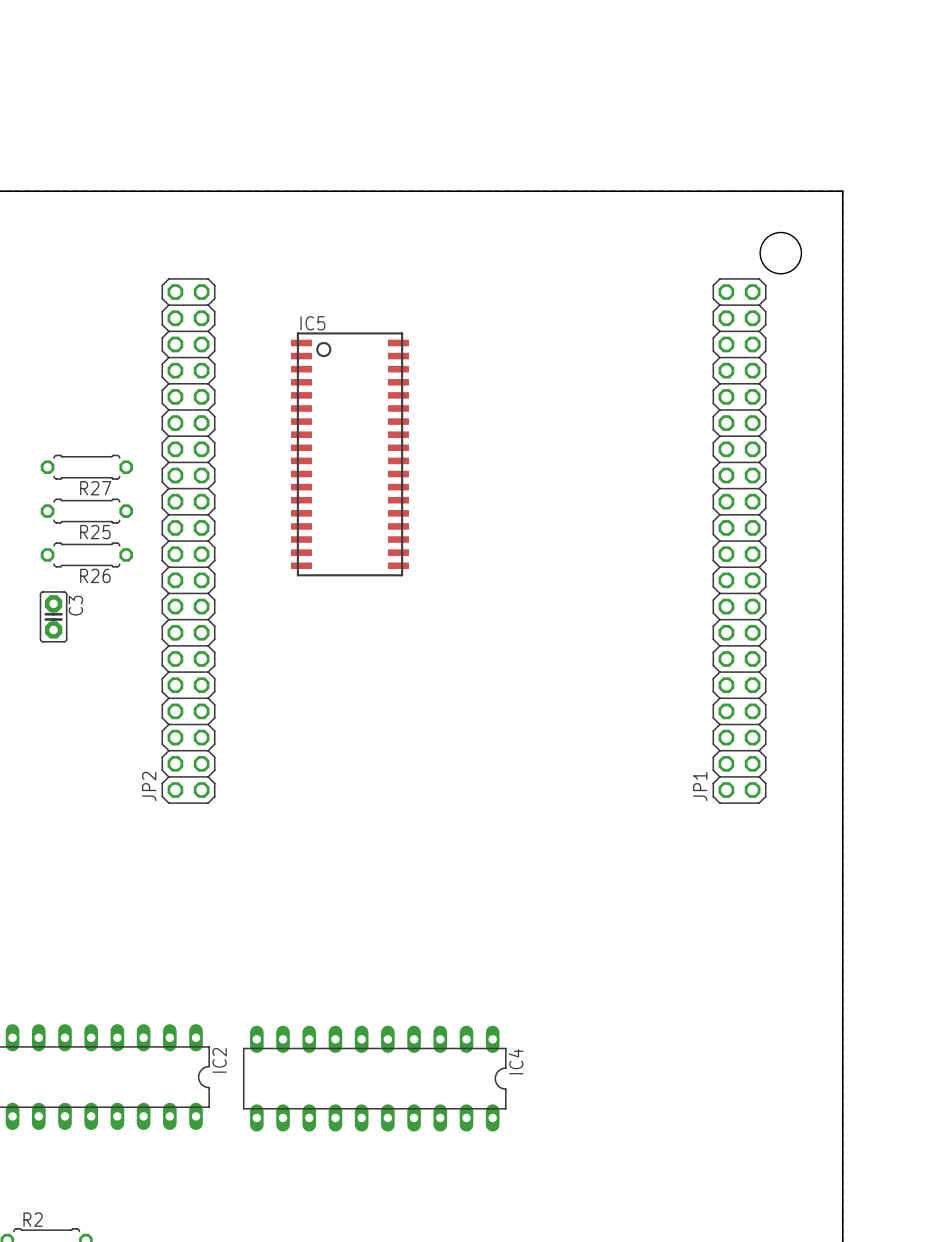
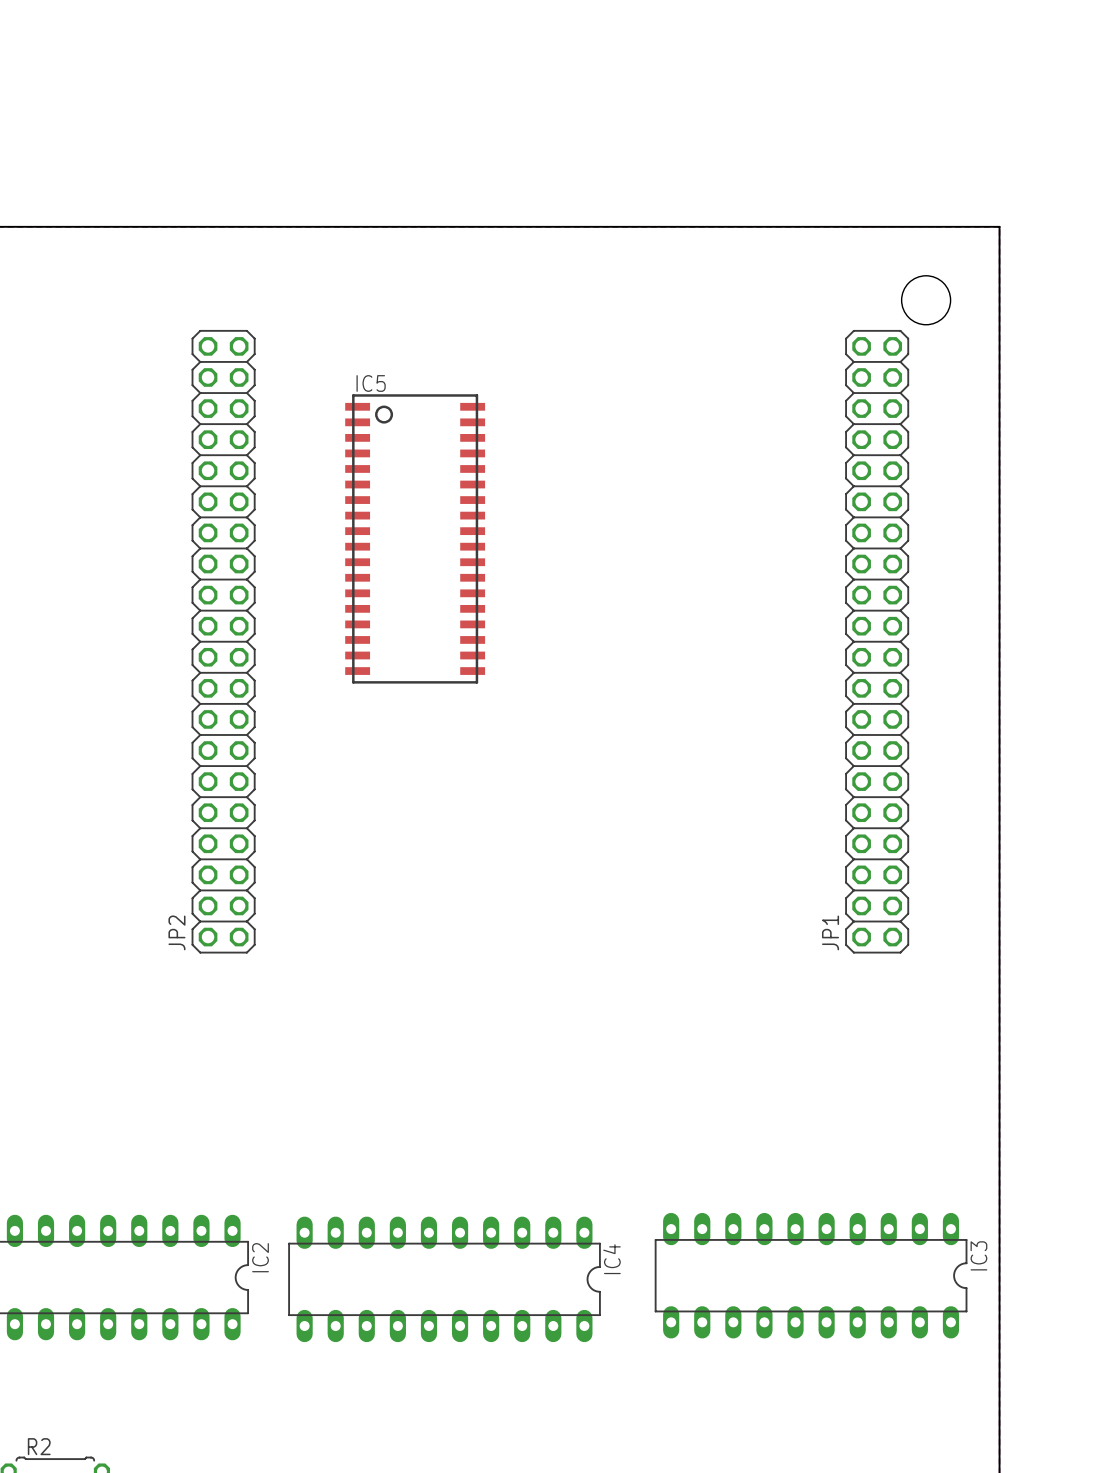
R27: (86, 467) -> none
R25: (86, 511) -> none
R26: (86, 554) -> none
C3: (53, 616) -> none
IC3: none -> (811, 1275)

